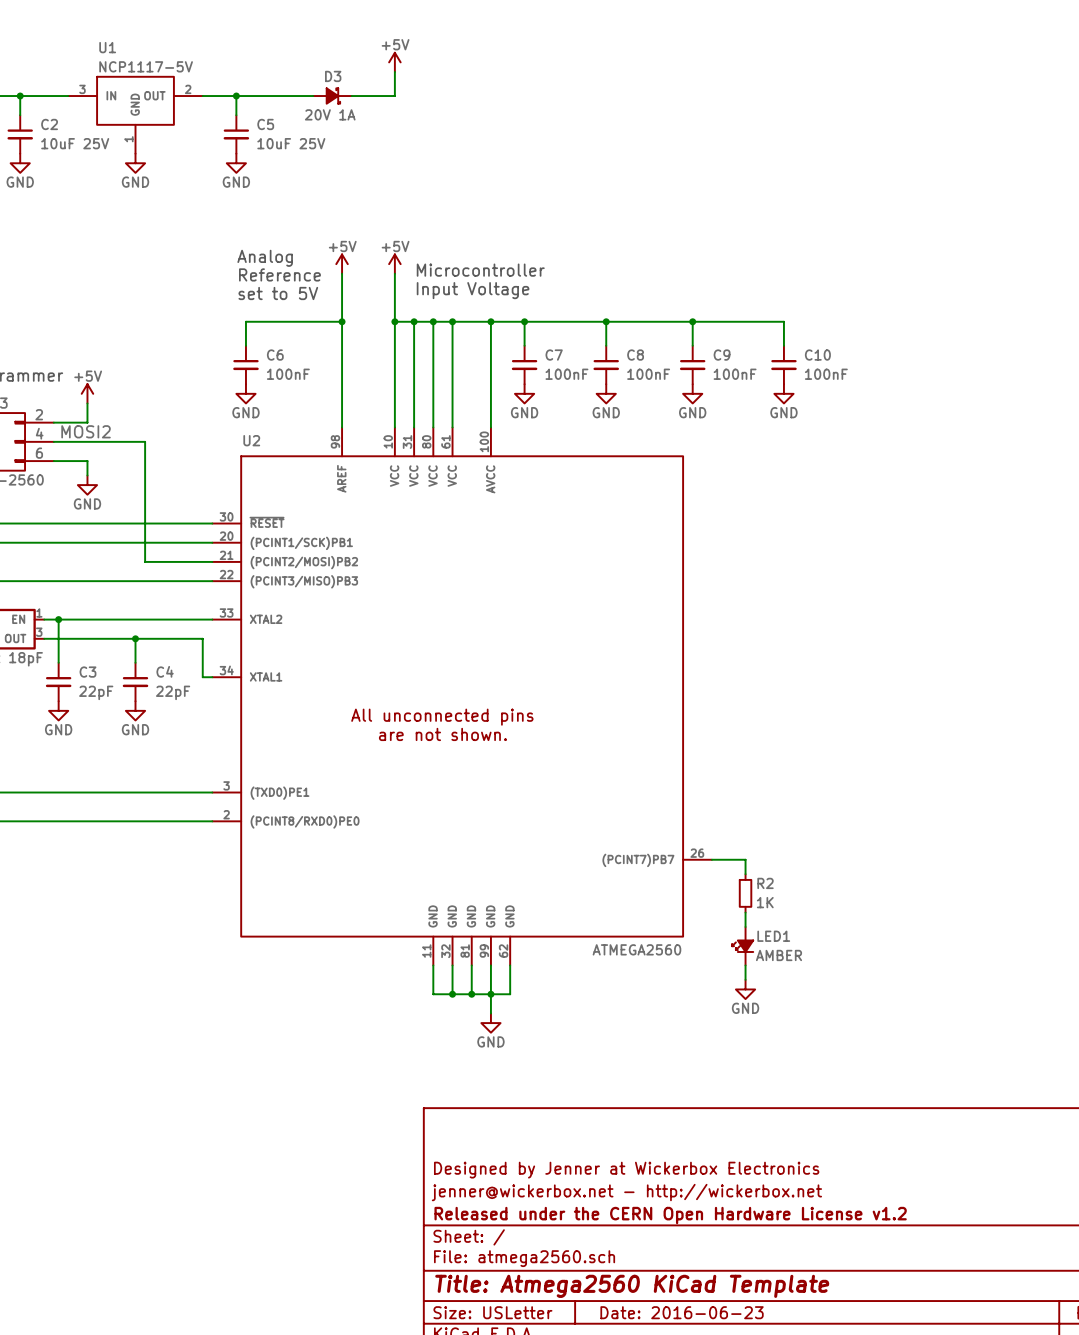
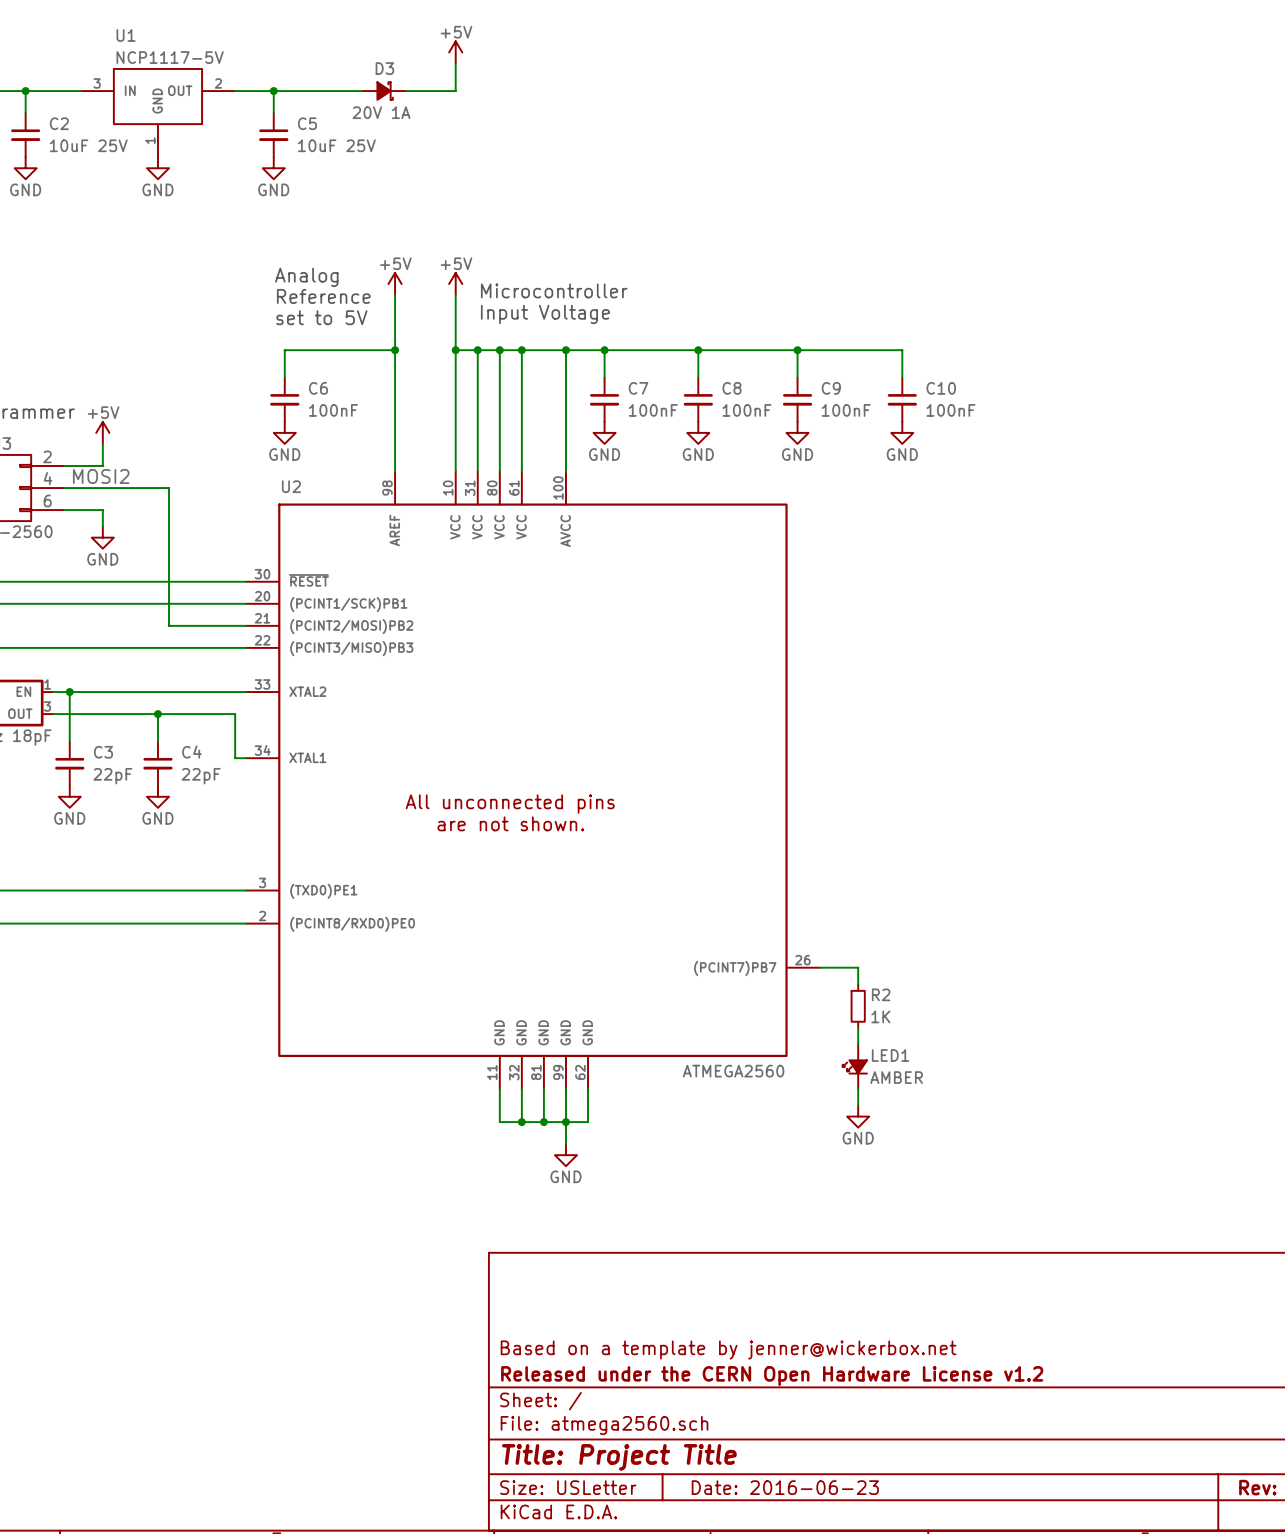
title block: Designed by Jenner at Wickerbox Electronics (626, 1170) -> none
title block: jenner@wickerbox.net - http://wickerbox.net (626, 1192) -> Based on a template by jenner@wickerbox.net (728, 1350)
title block: Title: Atmega2560 KiCad Template (632, 1286) -> Title: Project Title (619, 1457)

